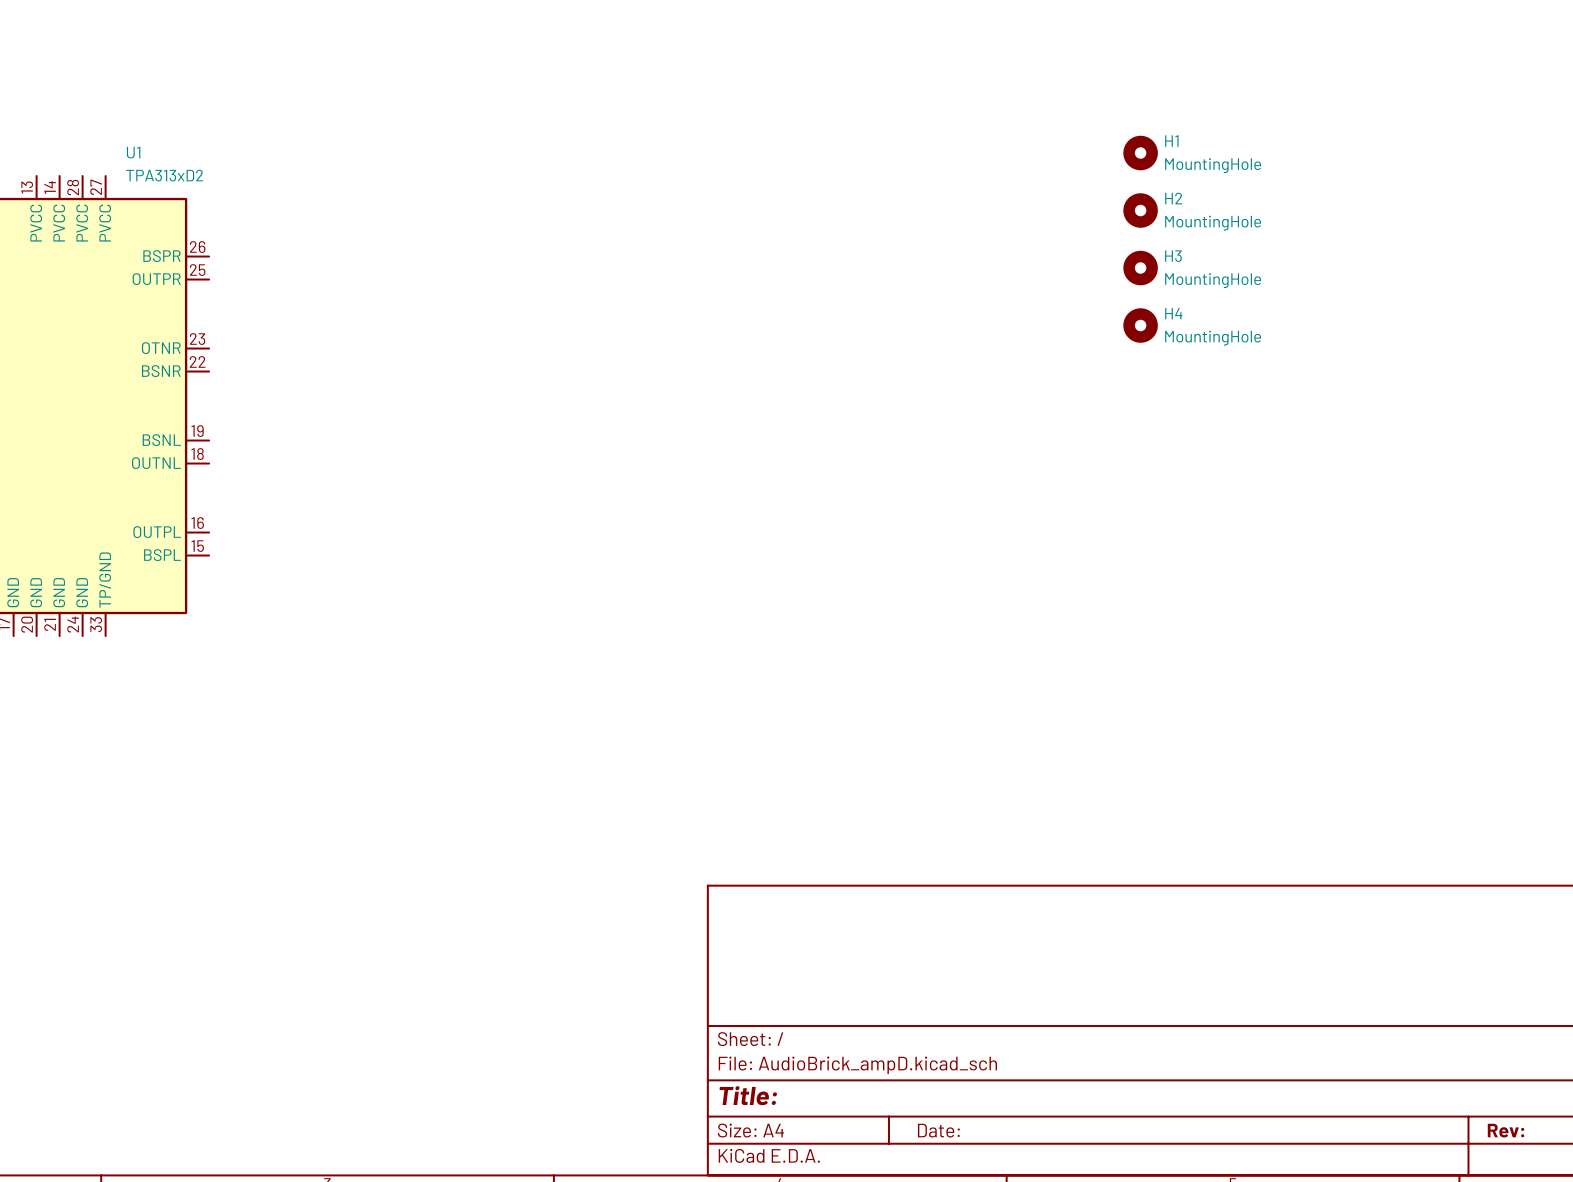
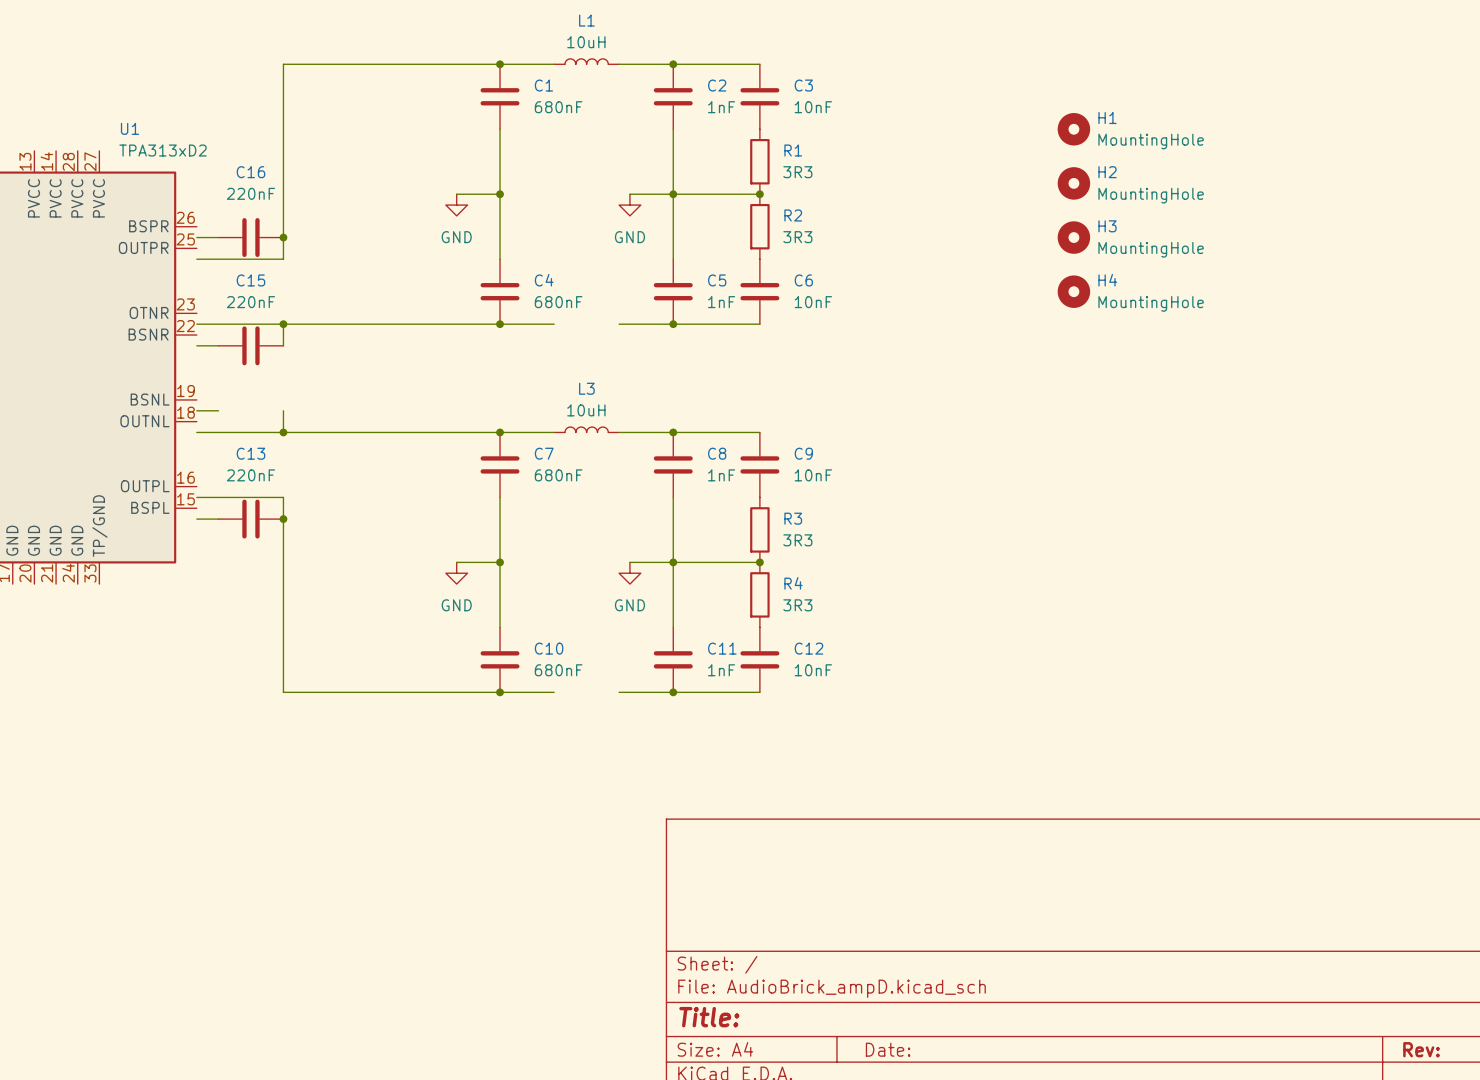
L1: none -> 10uH (586, 61)
junction: none -> (500, 64)
wire: none -> (554, 64) (283, 64) (283, 259) (196, 259)
wire: none -> (619, 64) (759, 64)
junction: none -> (673, 64)
C1: none -> 680nF (500, 96)
C2: none -> 1nF (673, 96)
C3: none -> 10nF (759, 96)
wire: none -> (500, 129) (500, 259)
wire: none -> (673, 129) (673, 259)
R1: none -> 3R3 (759, 161)
wire: none -> (456, 194) (500, 194)
junction: none -> (500, 194)
wire: none -> (629, 194) (759, 194)
junction: none -> (673, 194)
junction: none -> (759, 194)
power symbol: none -> GND (456, 205)
power symbol: none -> GND (629, 205)
R2: none -> 3R3 (759, 226)
wire: none -> (196, 237) (218, 237)
C16: none -> 220nF (250, 237)
junction: none -> (283, 237)
C4: none -> 680nF (500, 291)
C5: none -> 1nF (673, 291)
C6: none -> 10nF (759, 291)
wire: none -> (196, 324) (554, 324)
wire: none -> (283, 324) (283, 345)
junction: none -> (283, 324)
junction: none -> (500, 324)
wire: none -> (619, 324) (759, 324)
junction: none -> (673, 324)
wire: none -> (196, 345) (218, 345)
C15: none -> 220nF (250, 345)
wire: none -> (196, 410) (218, 410)
wire: none -> (283, 410) (283, 432)
L3: none -> 10uH (586, 429)
wire: none -> (196, 432) (554, 432)
junction: none -> (283, 432)
junction: none -> (500, 432)
wire: none -> (619, 432) (759, 432)
junction: none -> (673, 432)
C7: none -> 680nF (500, 464)
C8: none -> 1nF (673, 464)
C9: none -> 10nF (759, 464)
wire: none -> (196, 497) (283, 497) (283, 692) (554, 692)
wire: none -> (500, 497) (500, 627)
wire: none -> (673, 497) (673, 627)
wire: none -> (196, 519) (218, 519)
C13: none -> 220nF (250, 519)
junction: none -> (283, 519)
R3: none -> 3R3 (759, 529)
wire: none -> (456, 562) (500, 562)
junction: none -> (500, 562)
wire: none -> (629, 562) (759, 562)
junction: none -> (673, 562)
junction: none -> (759, 562)
power symbol: none -> GND (456, 573)
power symbol: none -> GND (629, 573)
R4: none -> 3R3 (759, 594)
C10: none -> 680nF (500, 659)
C11: none -> 1nF (673, 659)
C12: none -> 10nF (759, 659)
junction: none -> (500, 692)
wire: none -> (619, 692) (759, 692)
junction: none -> (673, 692)

